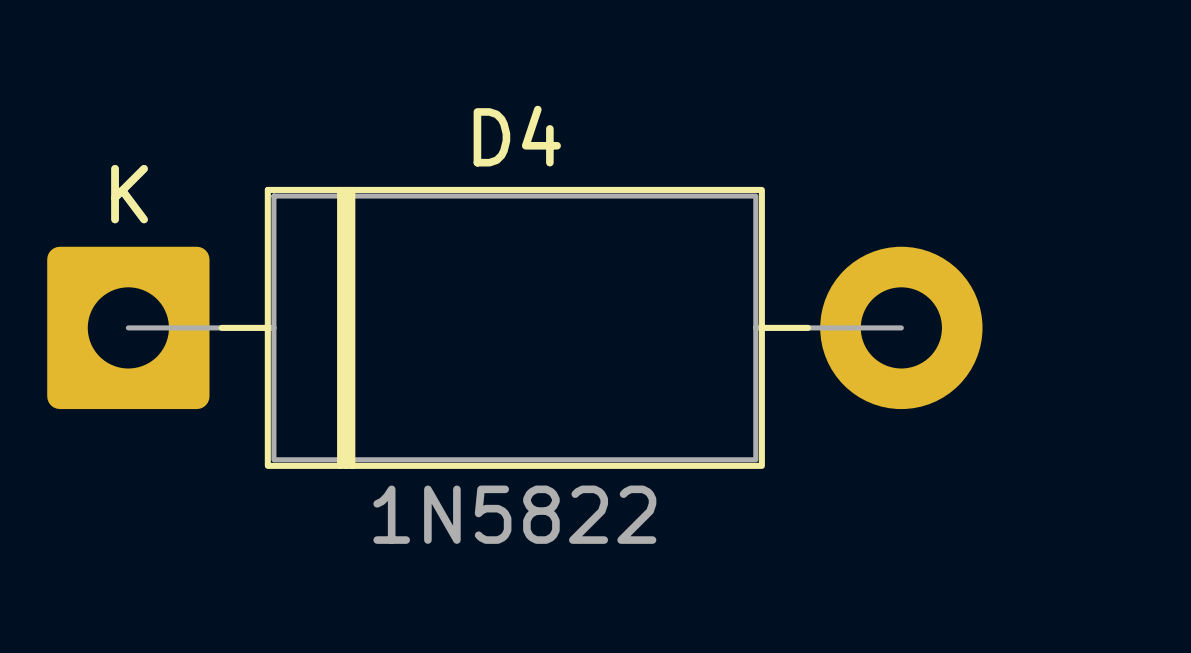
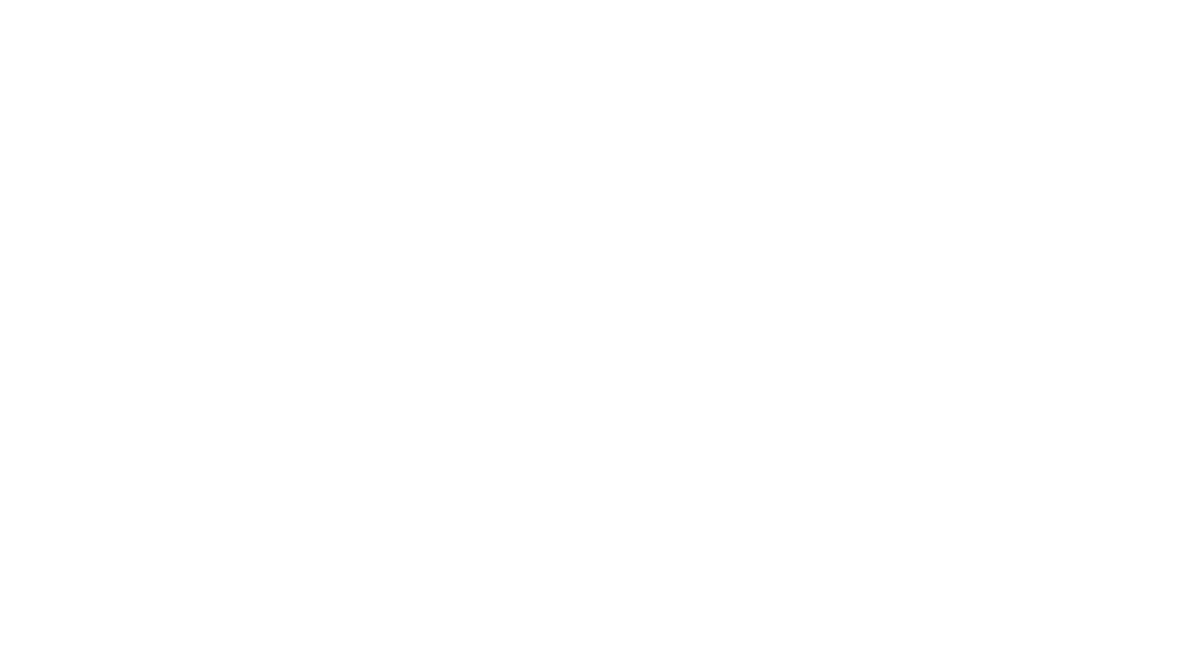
D4: 1N5822 (514, 327) -> none

